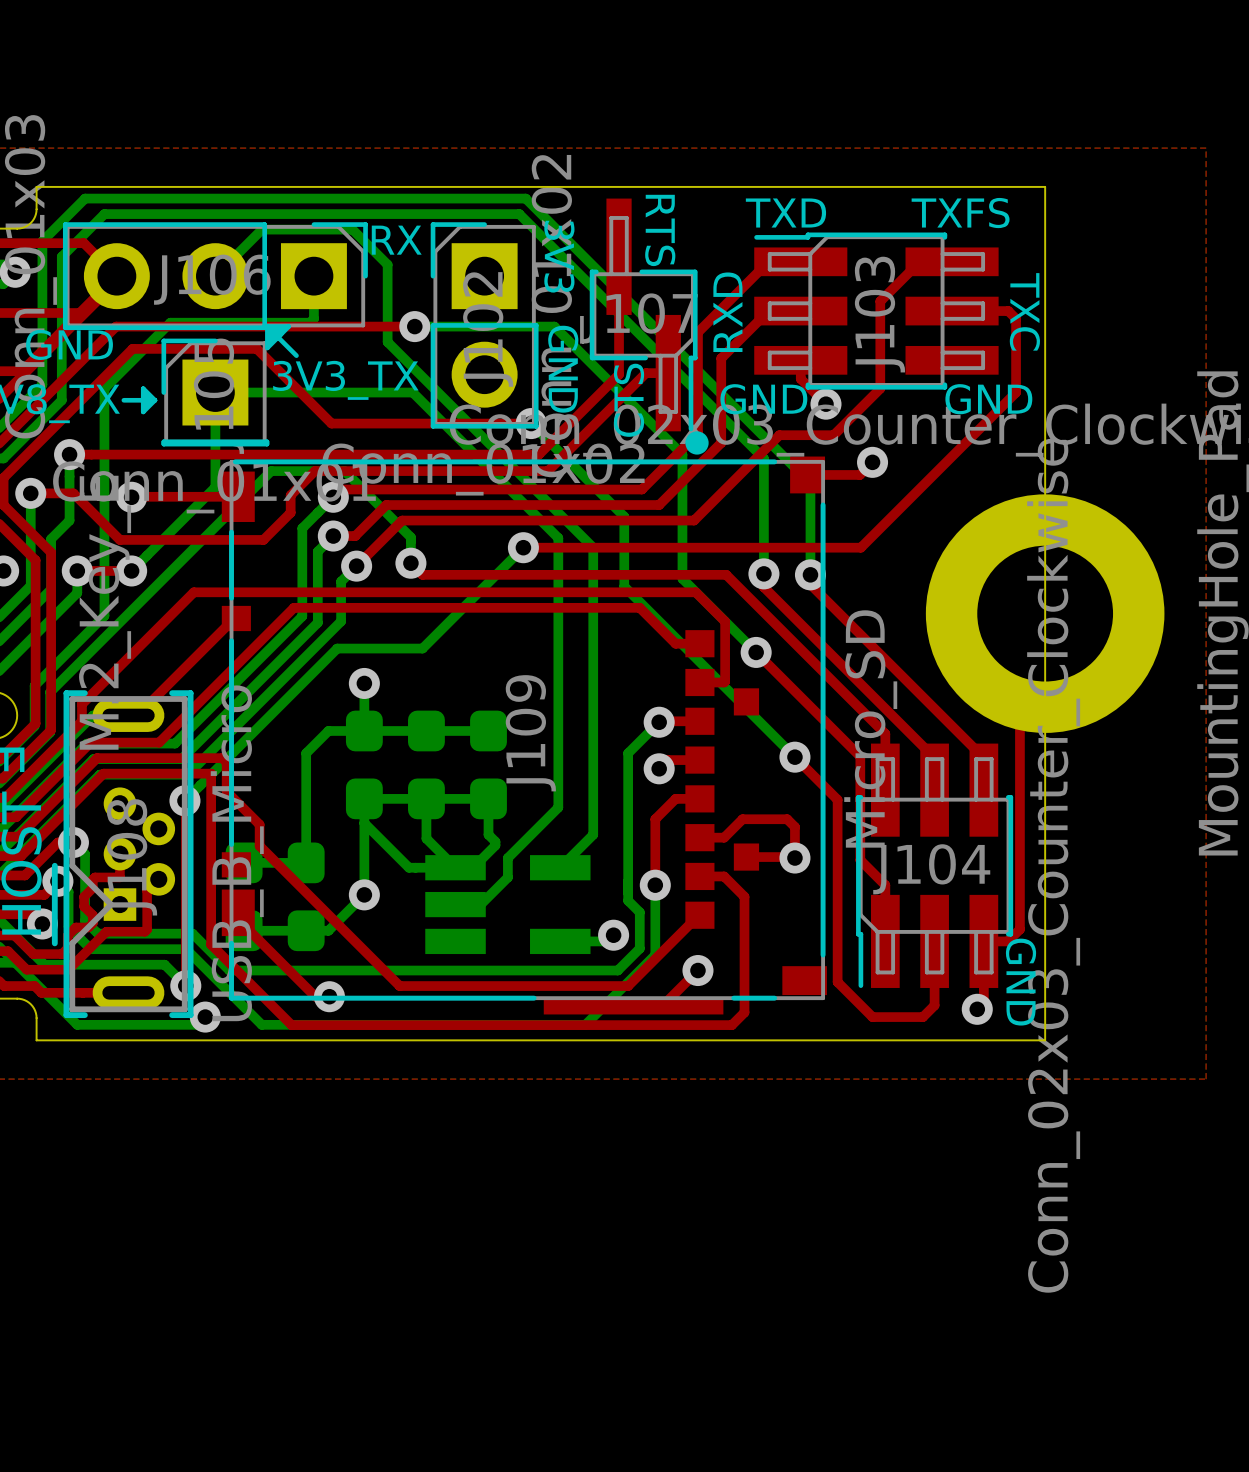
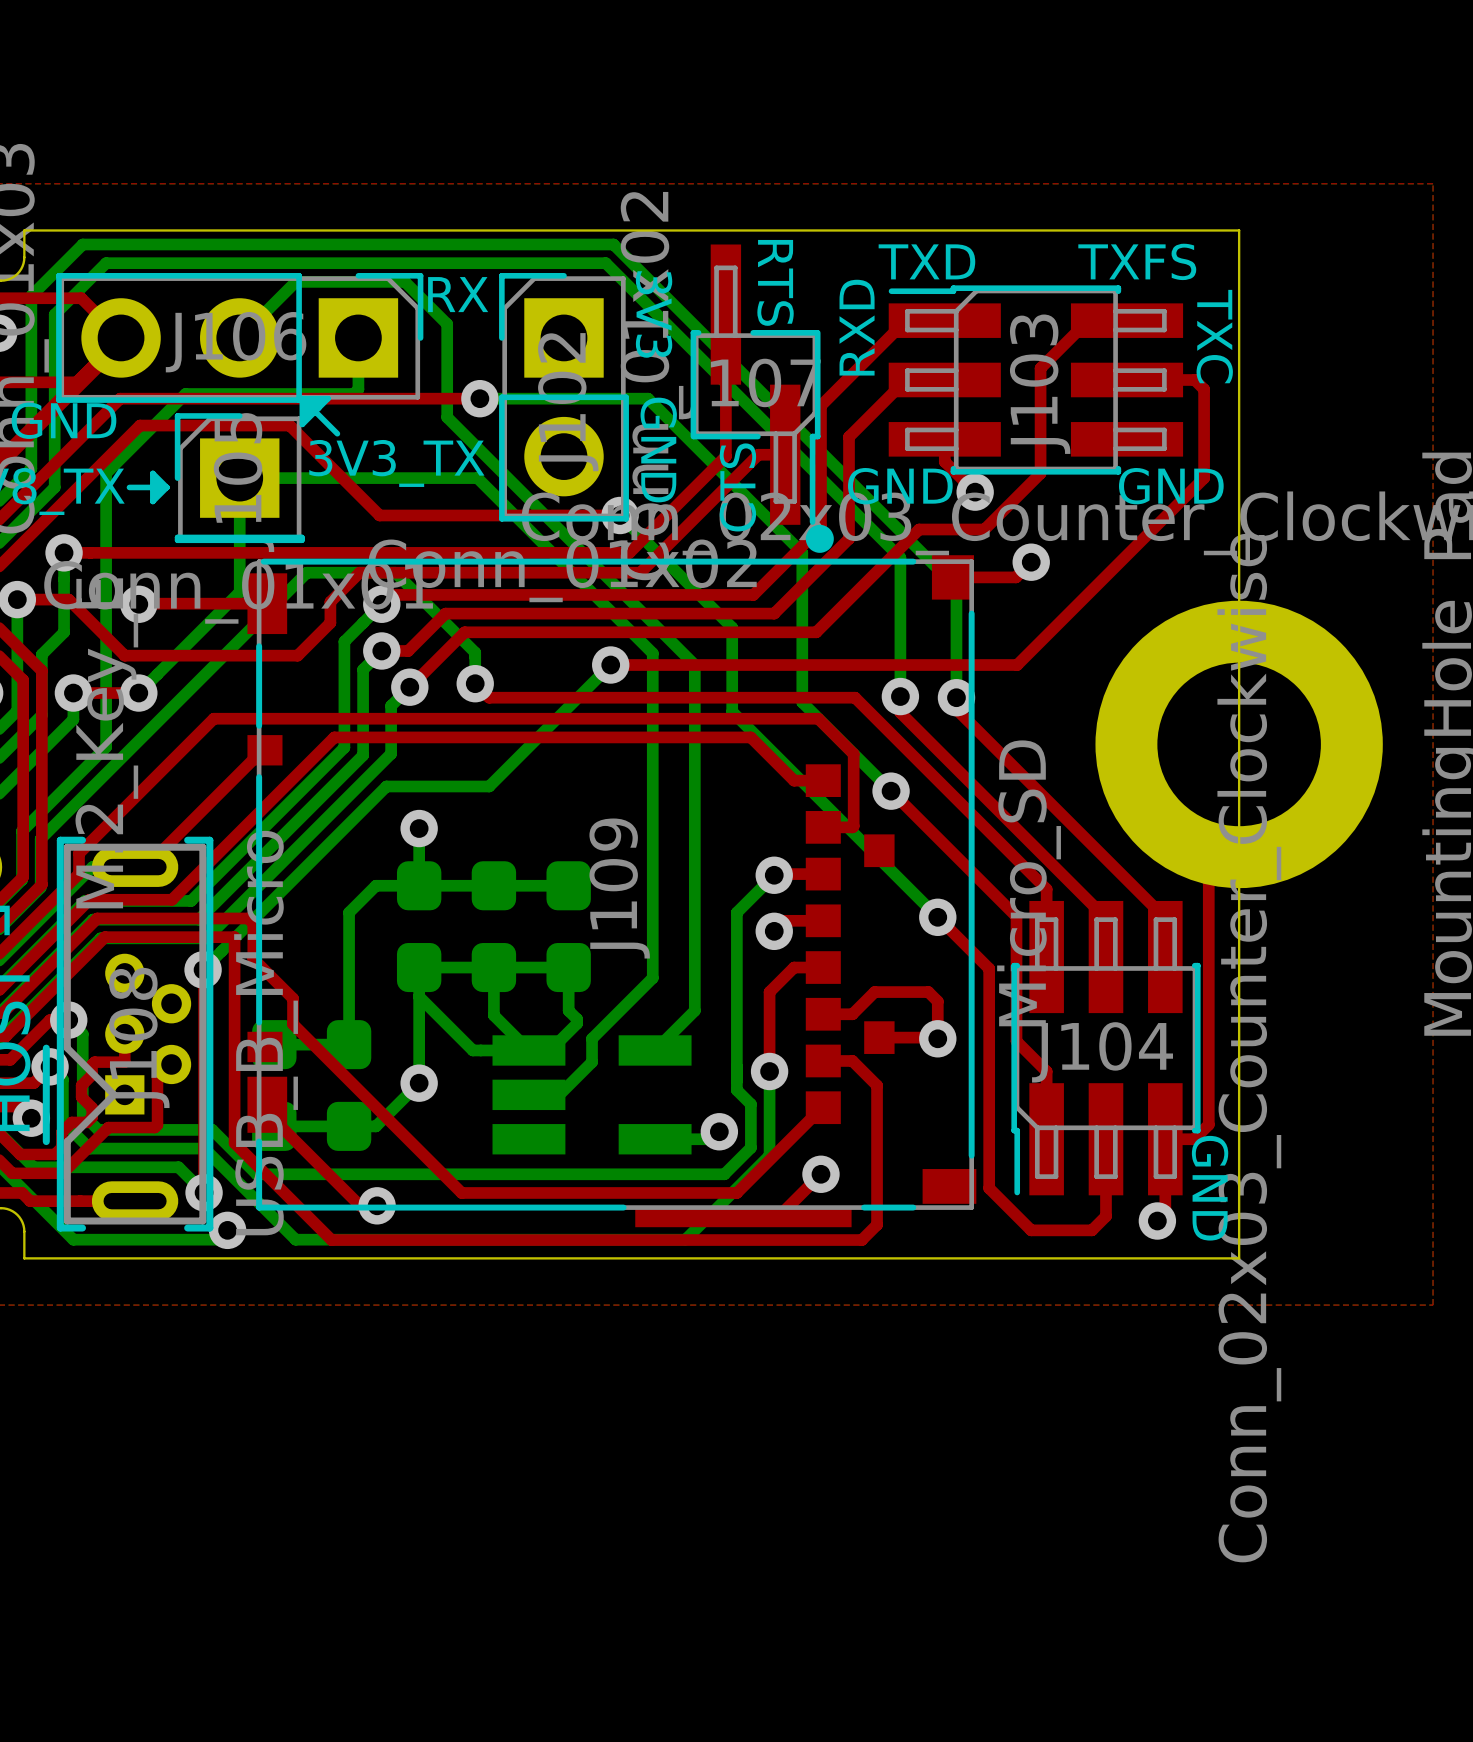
text position: TXC (1024, 311) -> TXC (1214, 336)
text position: RXD (727, 312) -> RXD (857, 327)

